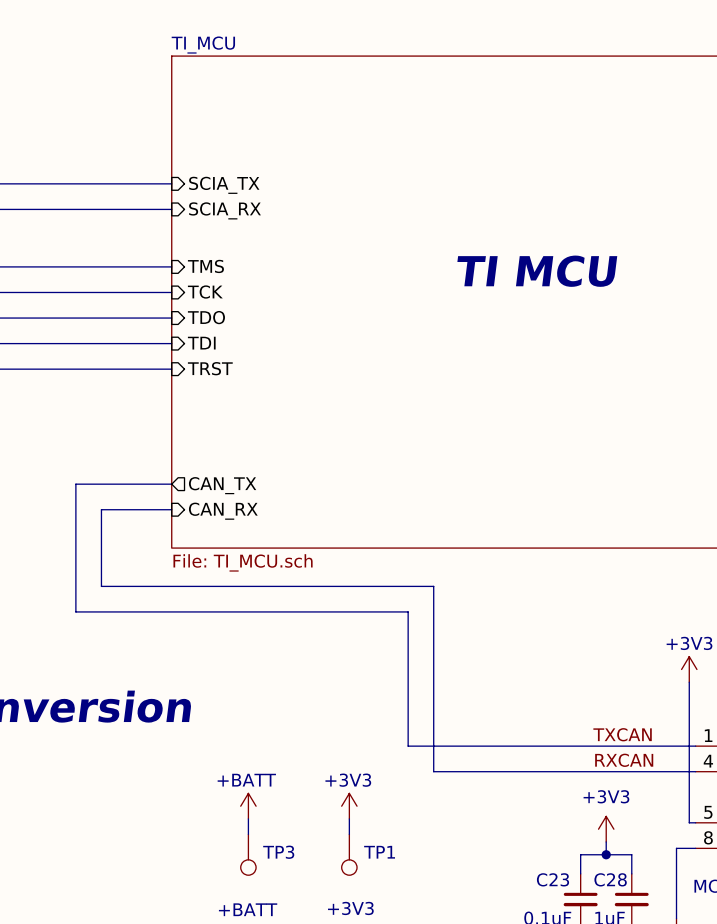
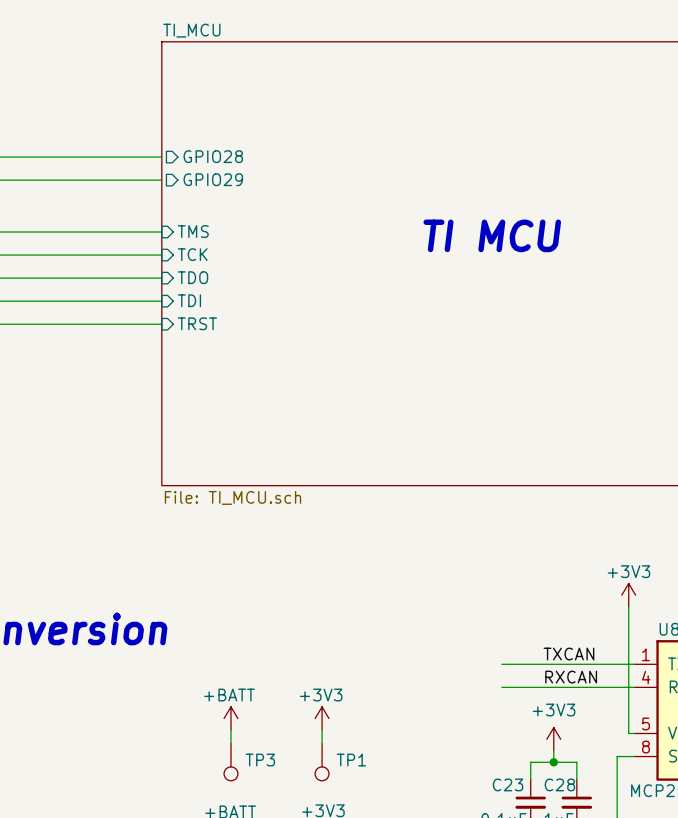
sheet pin: SCIA_TX (224, 185) -> GPIO28 (213, 156)
sheet pin: SCIA_RX (225, 210) -> GPIO29 (213, 179)
wire: (171, 484) (75, 484) (75, 611) (408, 611) (408, 746) (548, 746) -> none
sheet pin: CAN_TX (222, 485) -> none
wire: (171, 509) (101, 509) (101, 586) (433, 586) (433, 771) (548, 771) -> none
sheet pin: CAN_RX (223, 511) -> none

